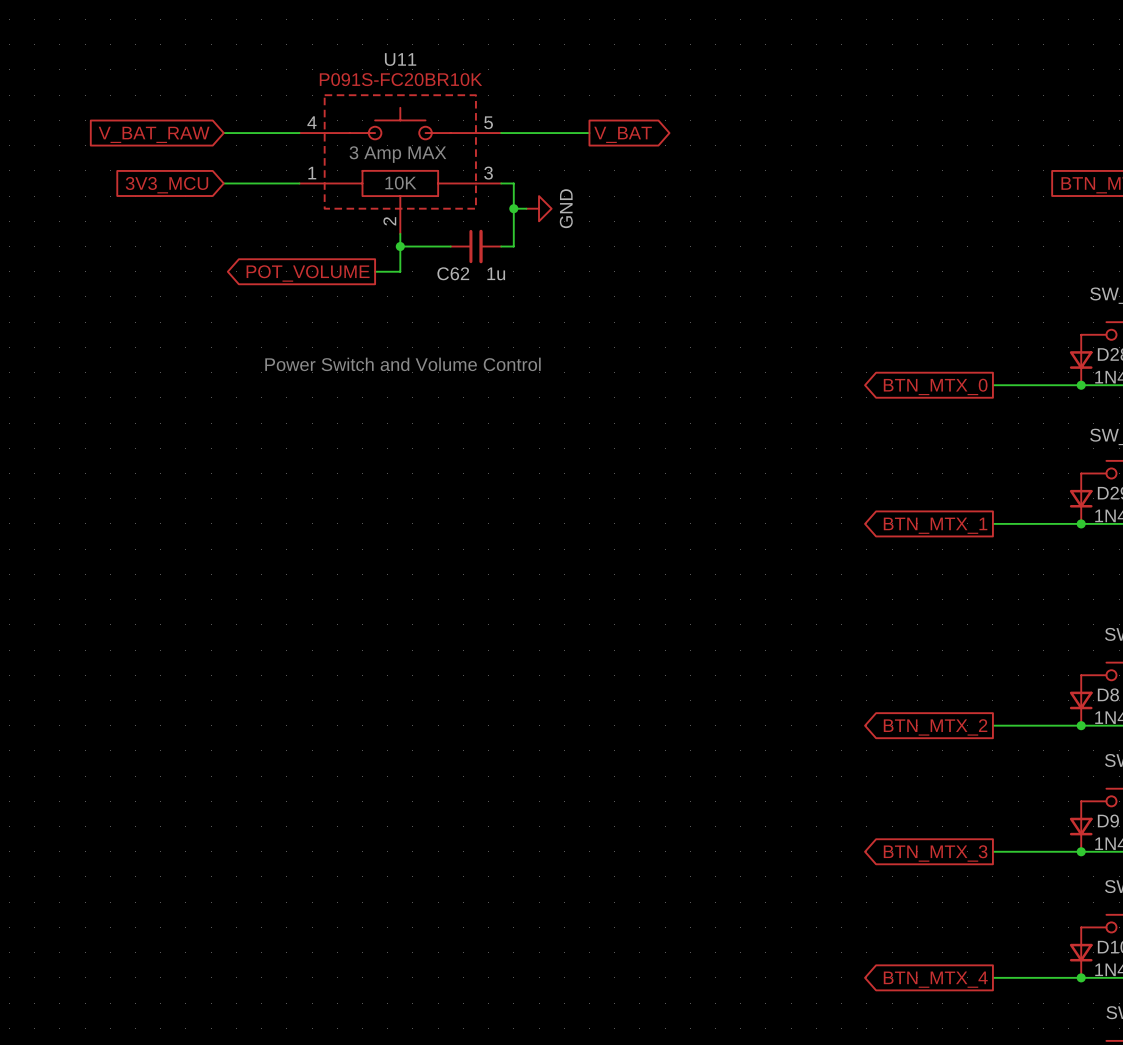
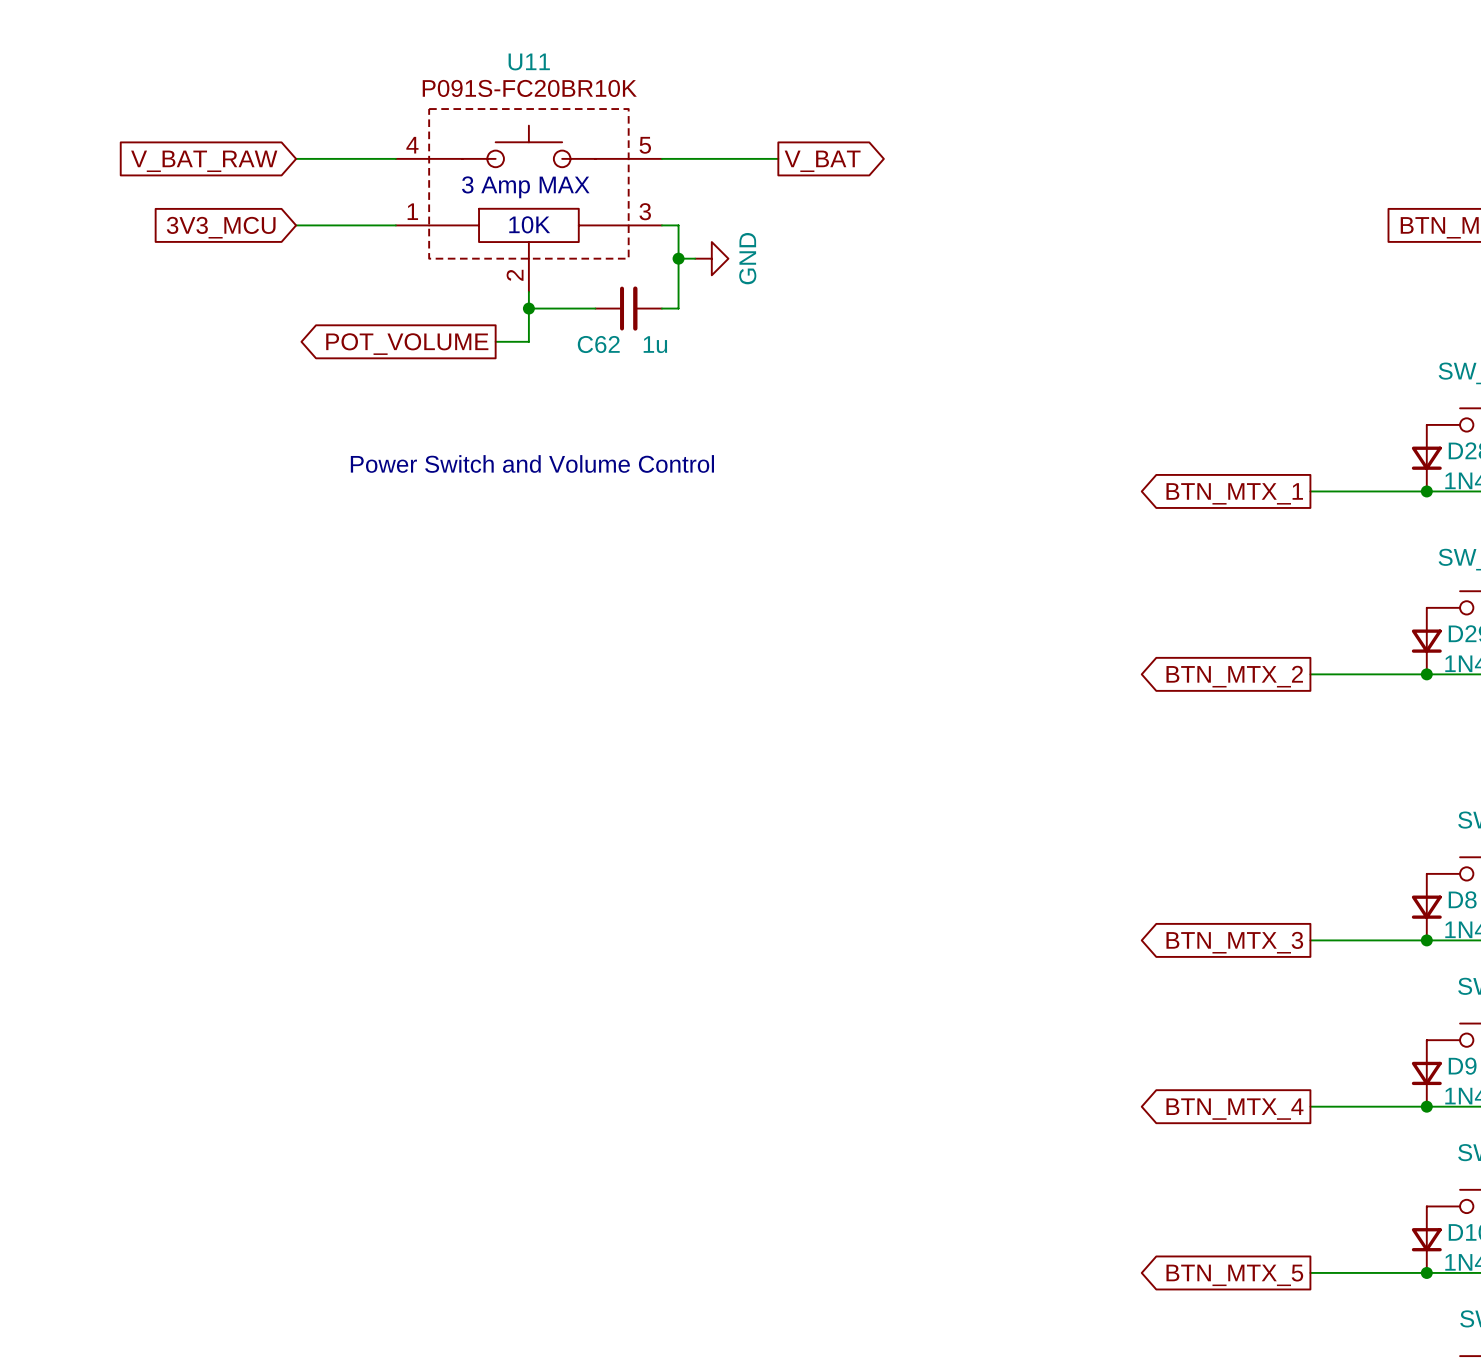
global label: BTN_MTX_0 (935, 386) -> BTN_MTX_1 (1234, 493)
global label: BTN_MTX_1 (935, 525) -> BTN_MTX_2 (1234, 676)
global label: BTN_MTX_2 (935, 727) -> BTN_MTX_3 (1234, 942)
global label: BTN_MTX_3 (935, 853) -> BTN_MTX_4 (1234, 1109)
global label: BTN_MTX_4 (935, 979) -> BTN_MTX_5 (1234, 1275)

